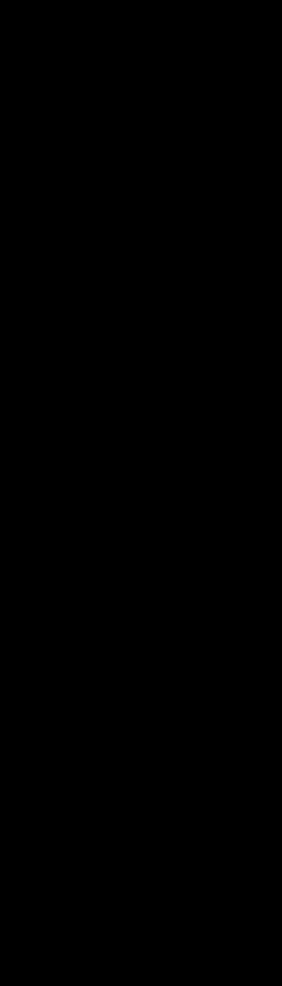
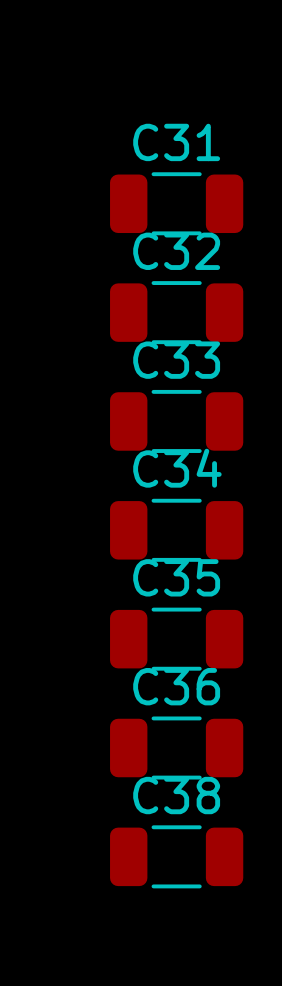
C31: none -> (176, 203)
C32: none -> (176, 312)
C33: none -> (176, 421)
C34: none -> (176, 530)
C35: none -> (176, 639)
C36: none -> (176, 748)
C38: none -> (176, 856)

